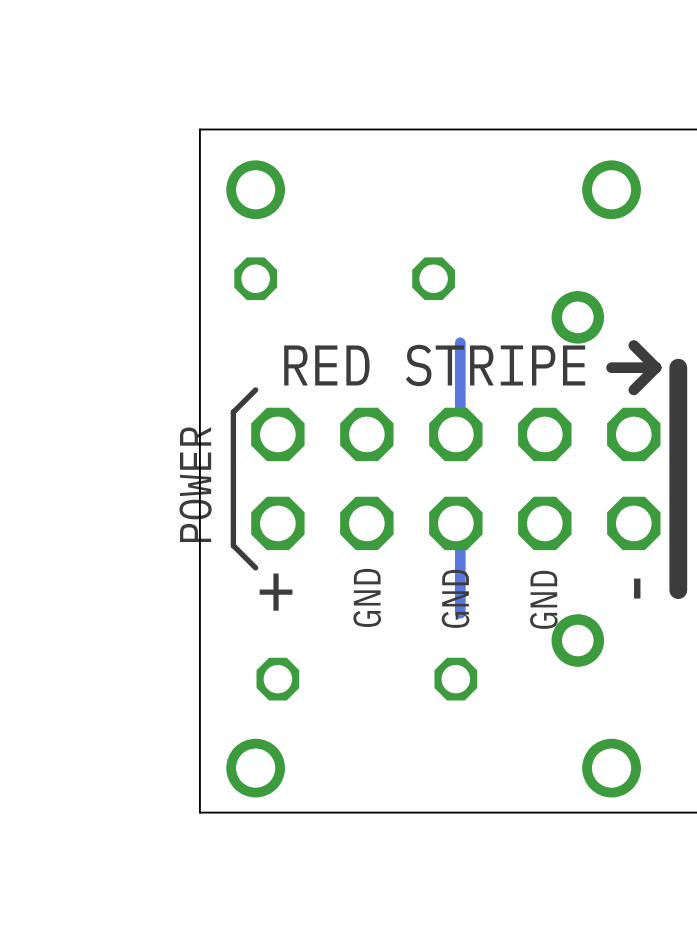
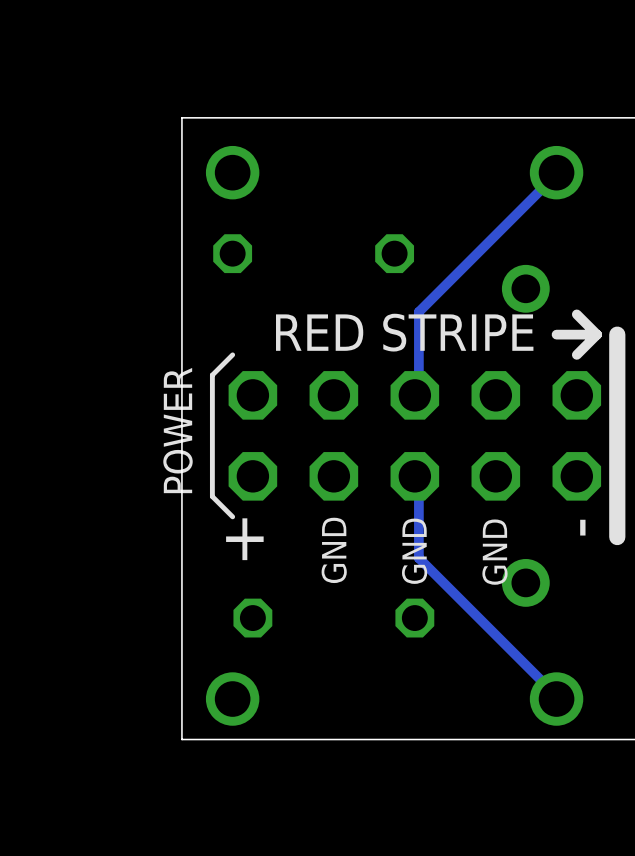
track: none -> (554, 175) (418, 311)
track: none -> (418, 558) (554, 694)

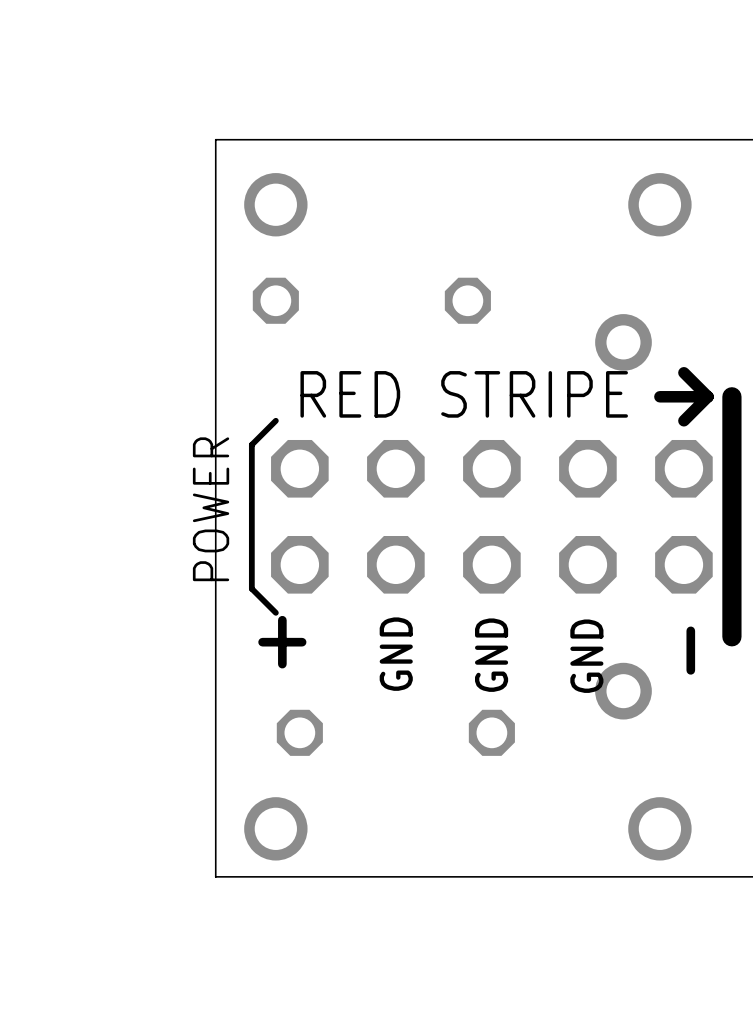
track: (556, 172) (418, 311) (418, 389) (414, 395) -> none
track: (414, 476) (418, 480) (418, 558) (554, 694) (556, 699) -> none

